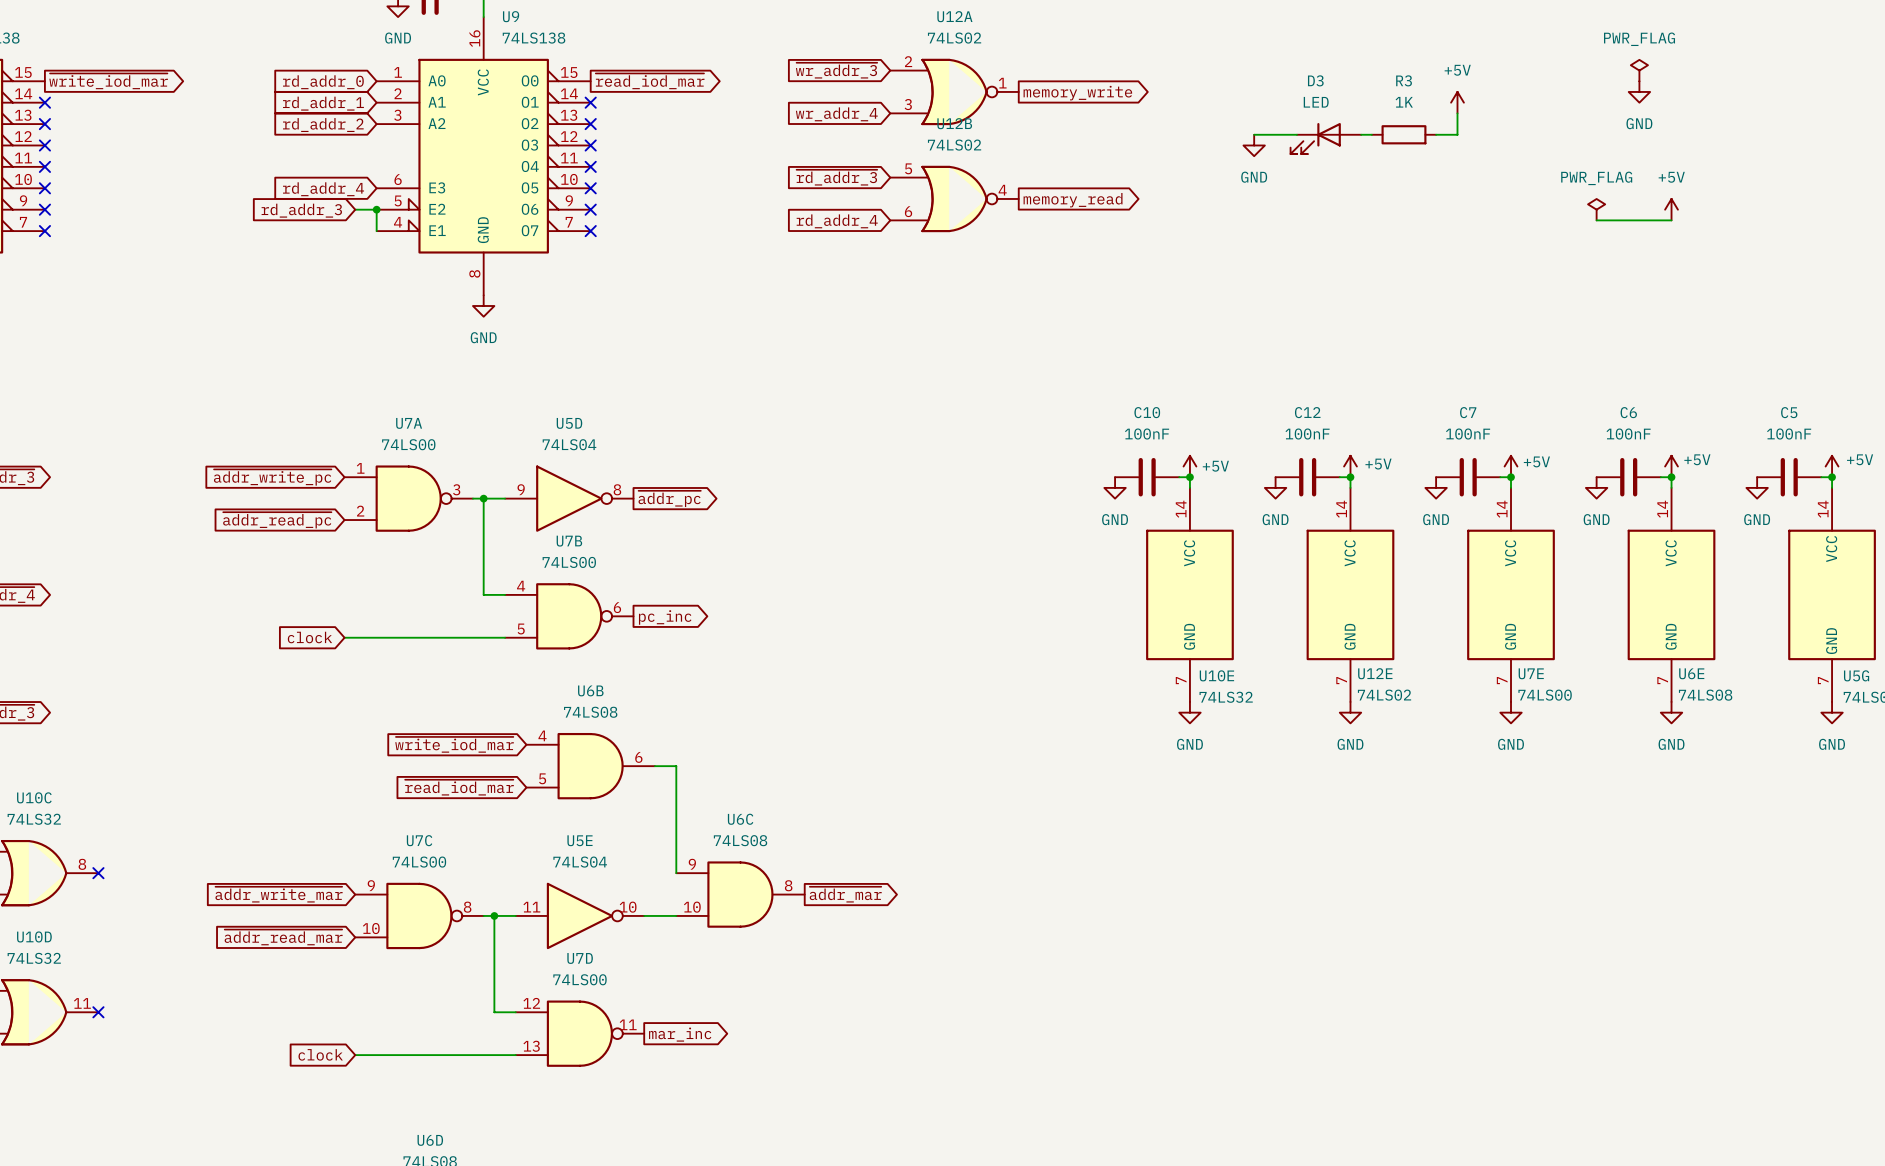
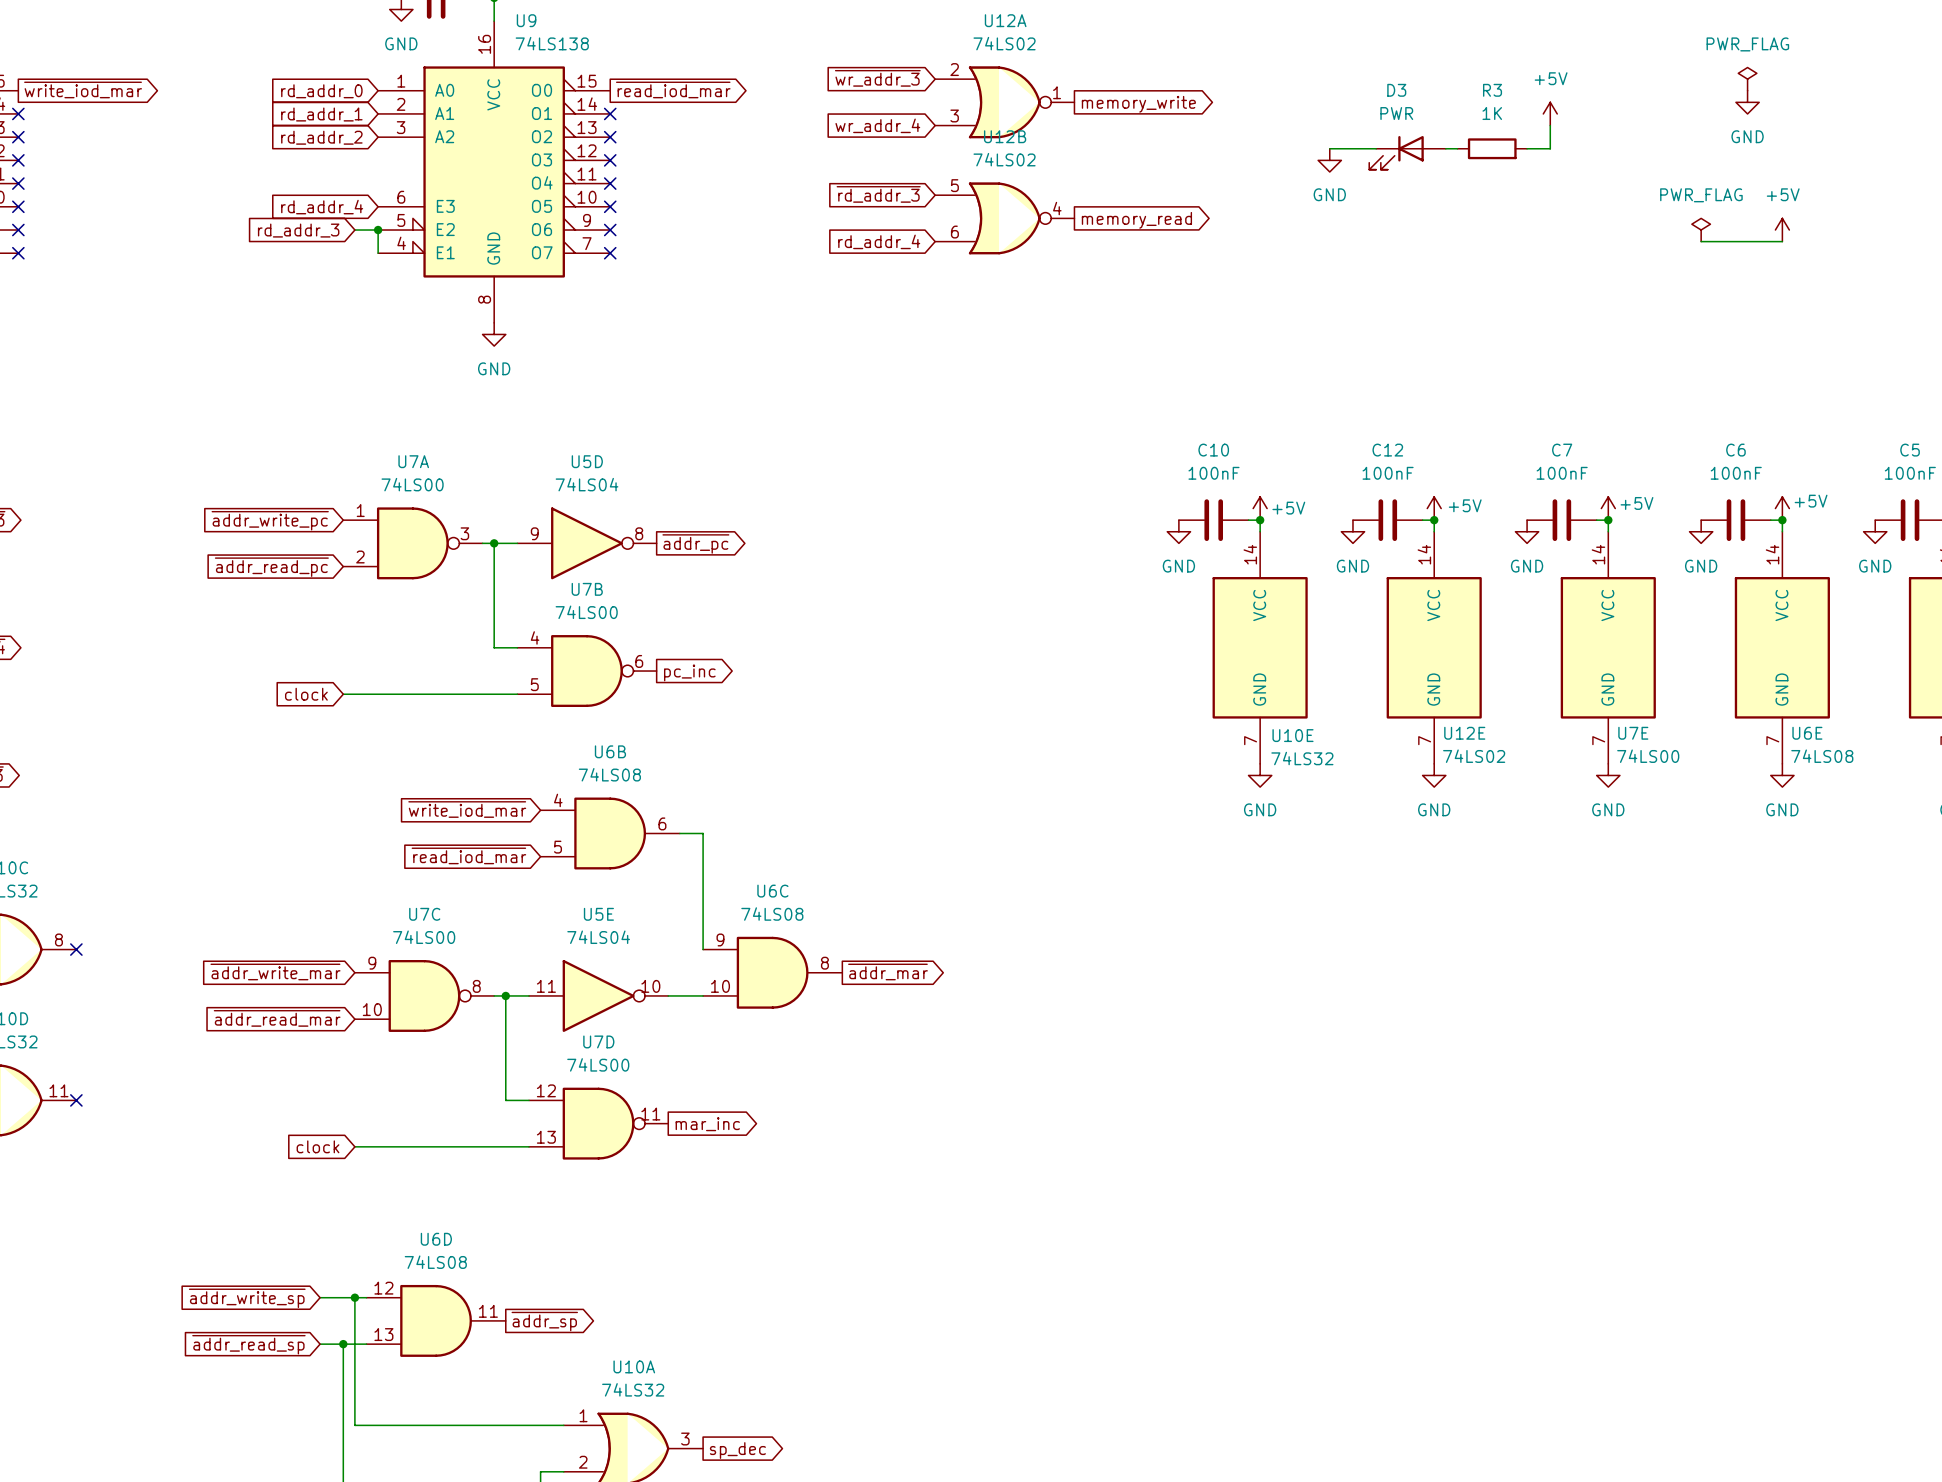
D3 value: LED (1316, 102) -> PWR (1396, 113)

